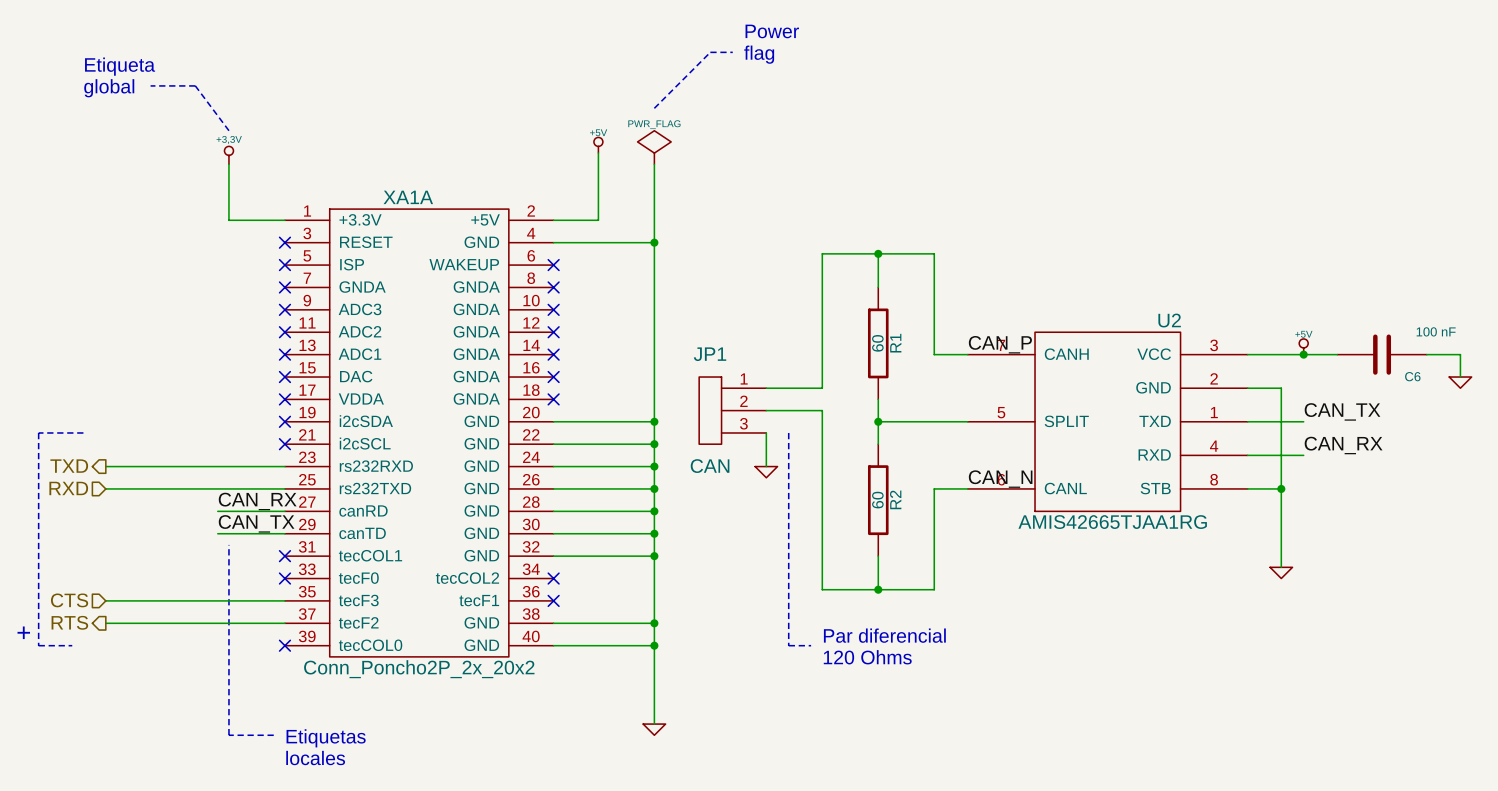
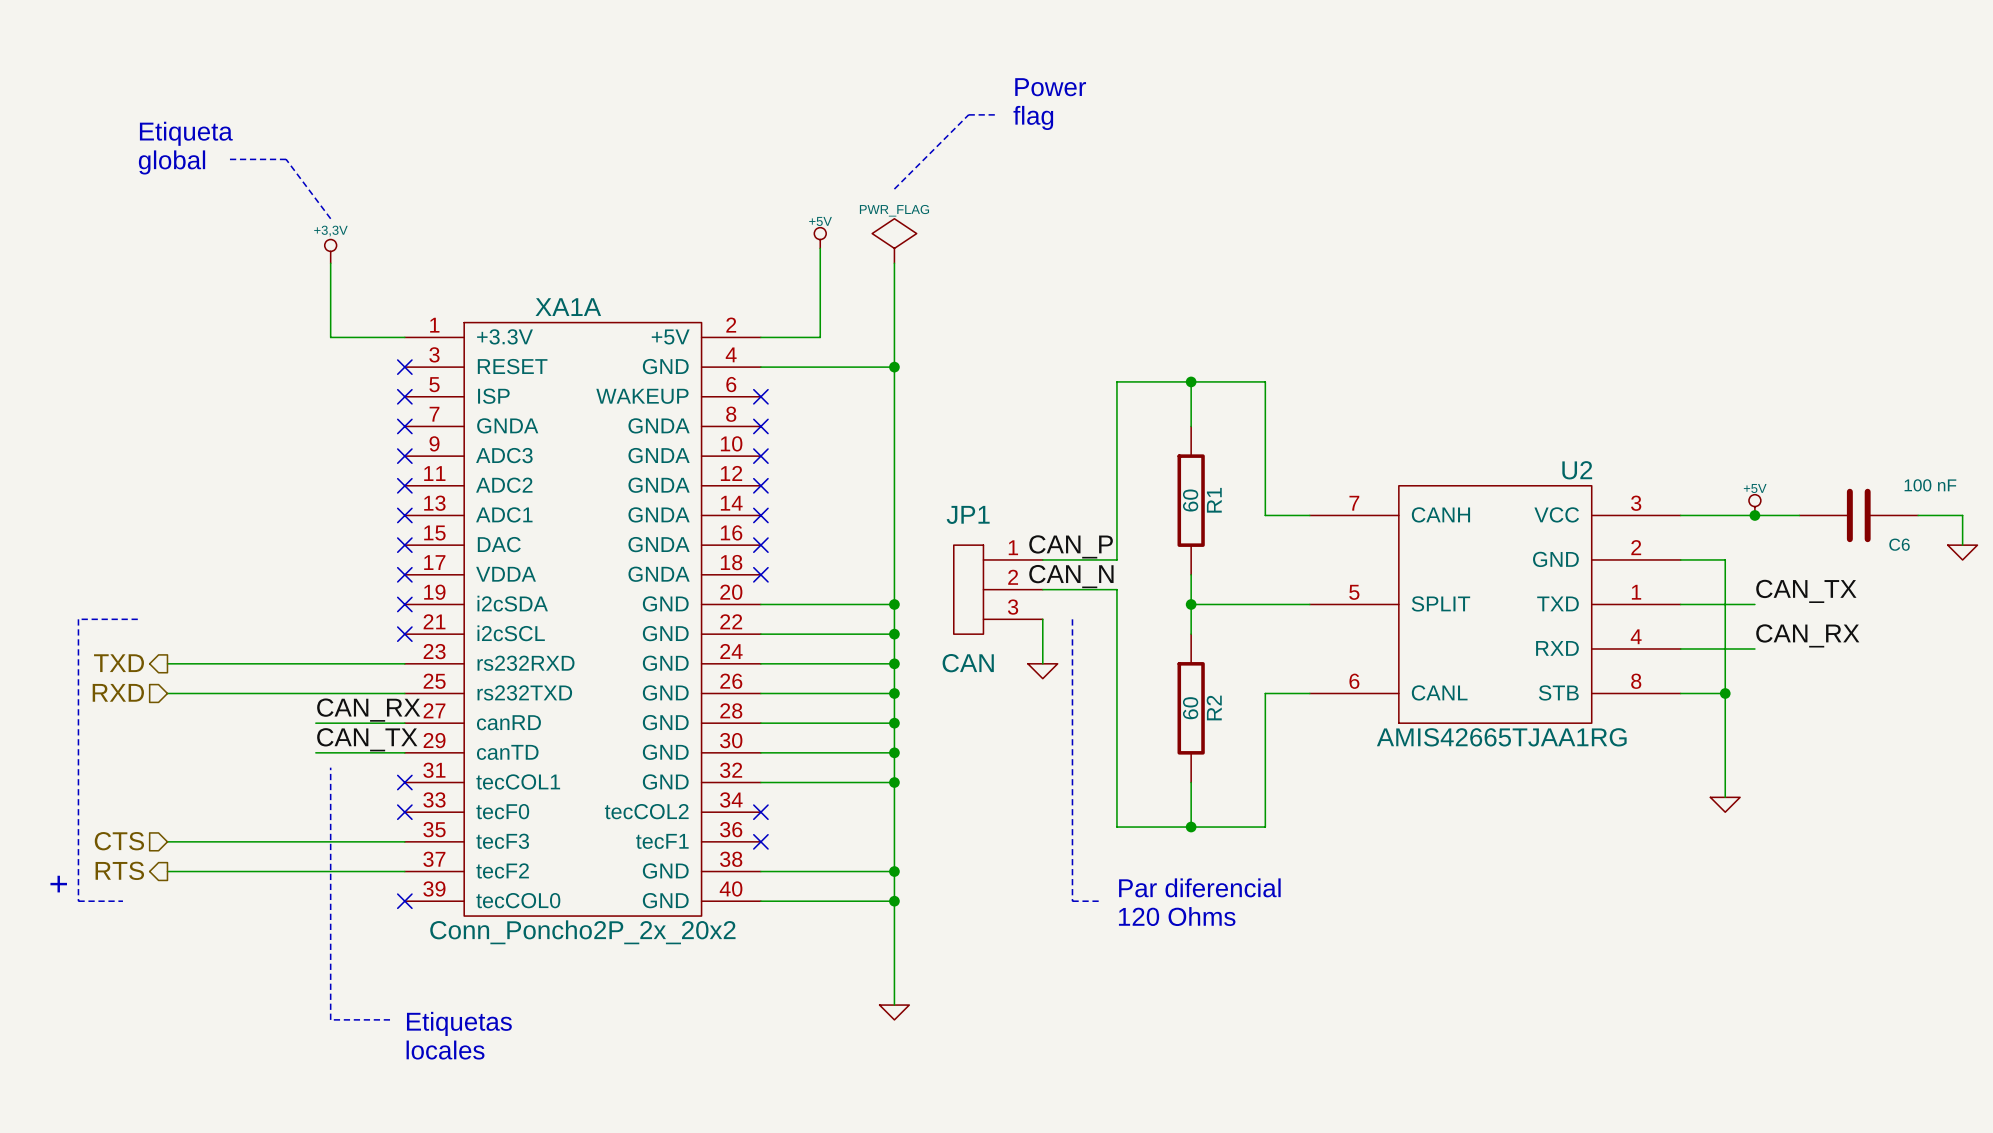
label position: CAN_P (1000, 344) -> CAN_P (1071, 546)
label: none -> CAN_N (1071, 576)
label: CAN_N (1000, 479) -> none

